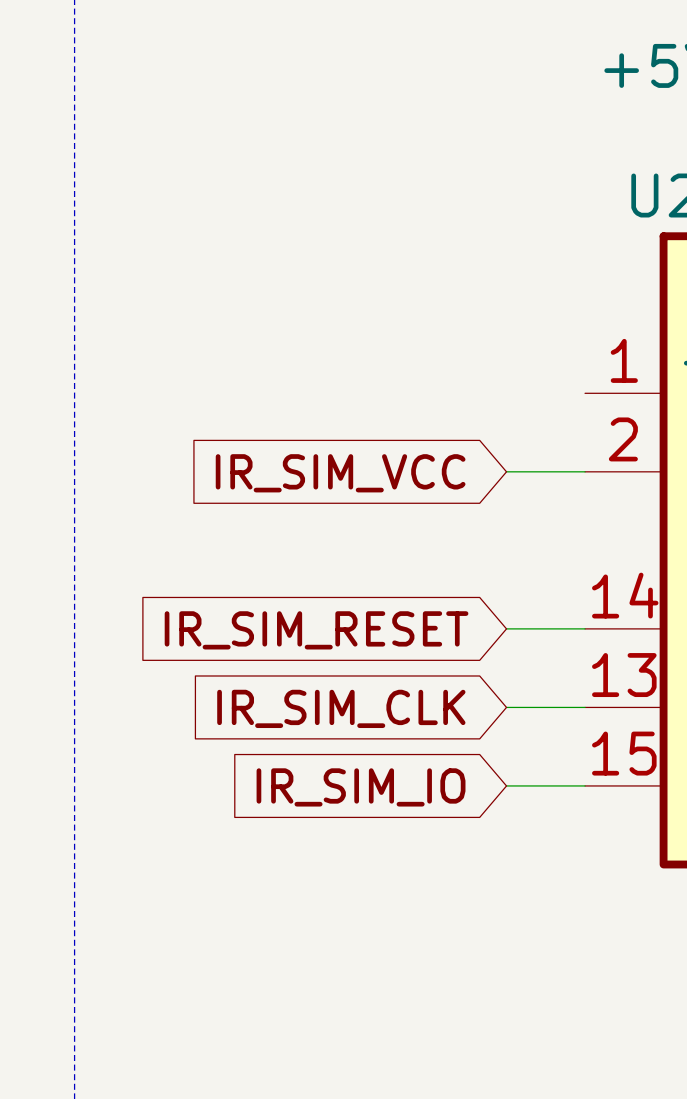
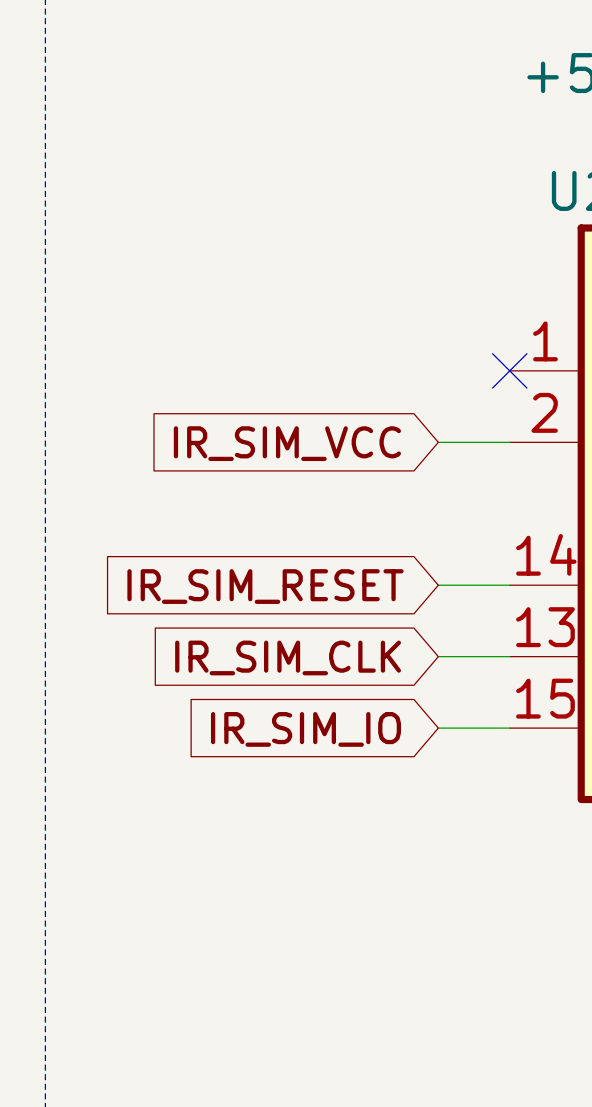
no-connect mark: none -> (509, 370)

